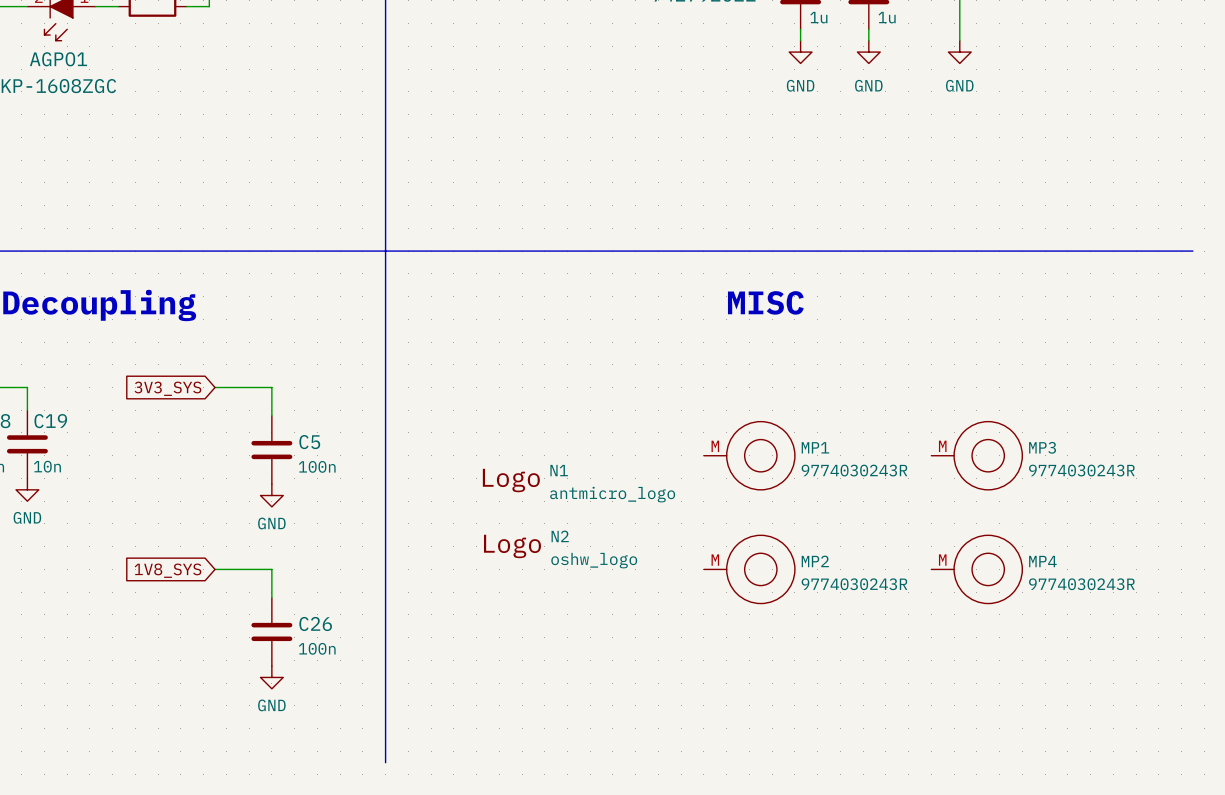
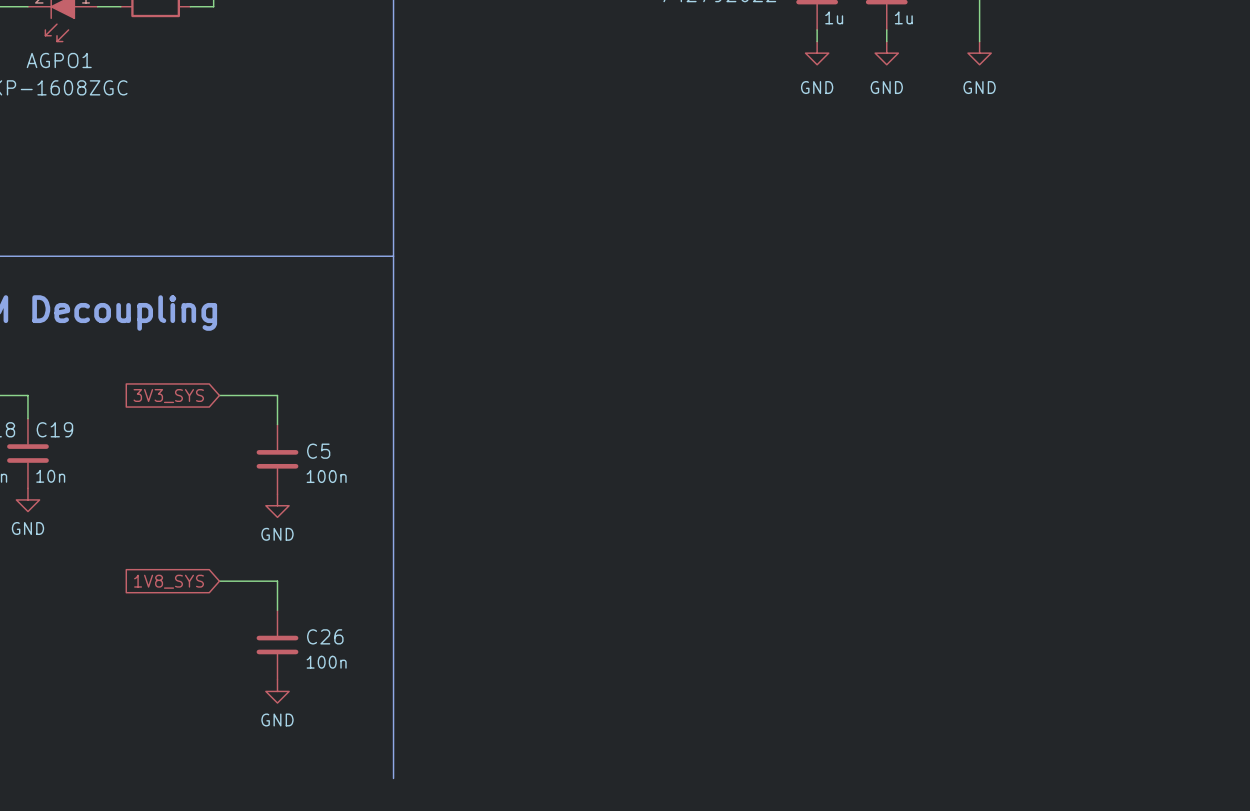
line: (385, 251) (1192, 251) -> none
text: MISC (765, 302) -> none
MP1: 9774030243R (749, 455) -> none
MP3: 9774030243R (976, 455) -> none
N1: antmicro_logo (578, 483) -> none
N2: oshw_logo (560, 549) -> none
MP2: 9774030243R (749, 569) -> none
MP4: 9774030243R (976, 569) -> none

